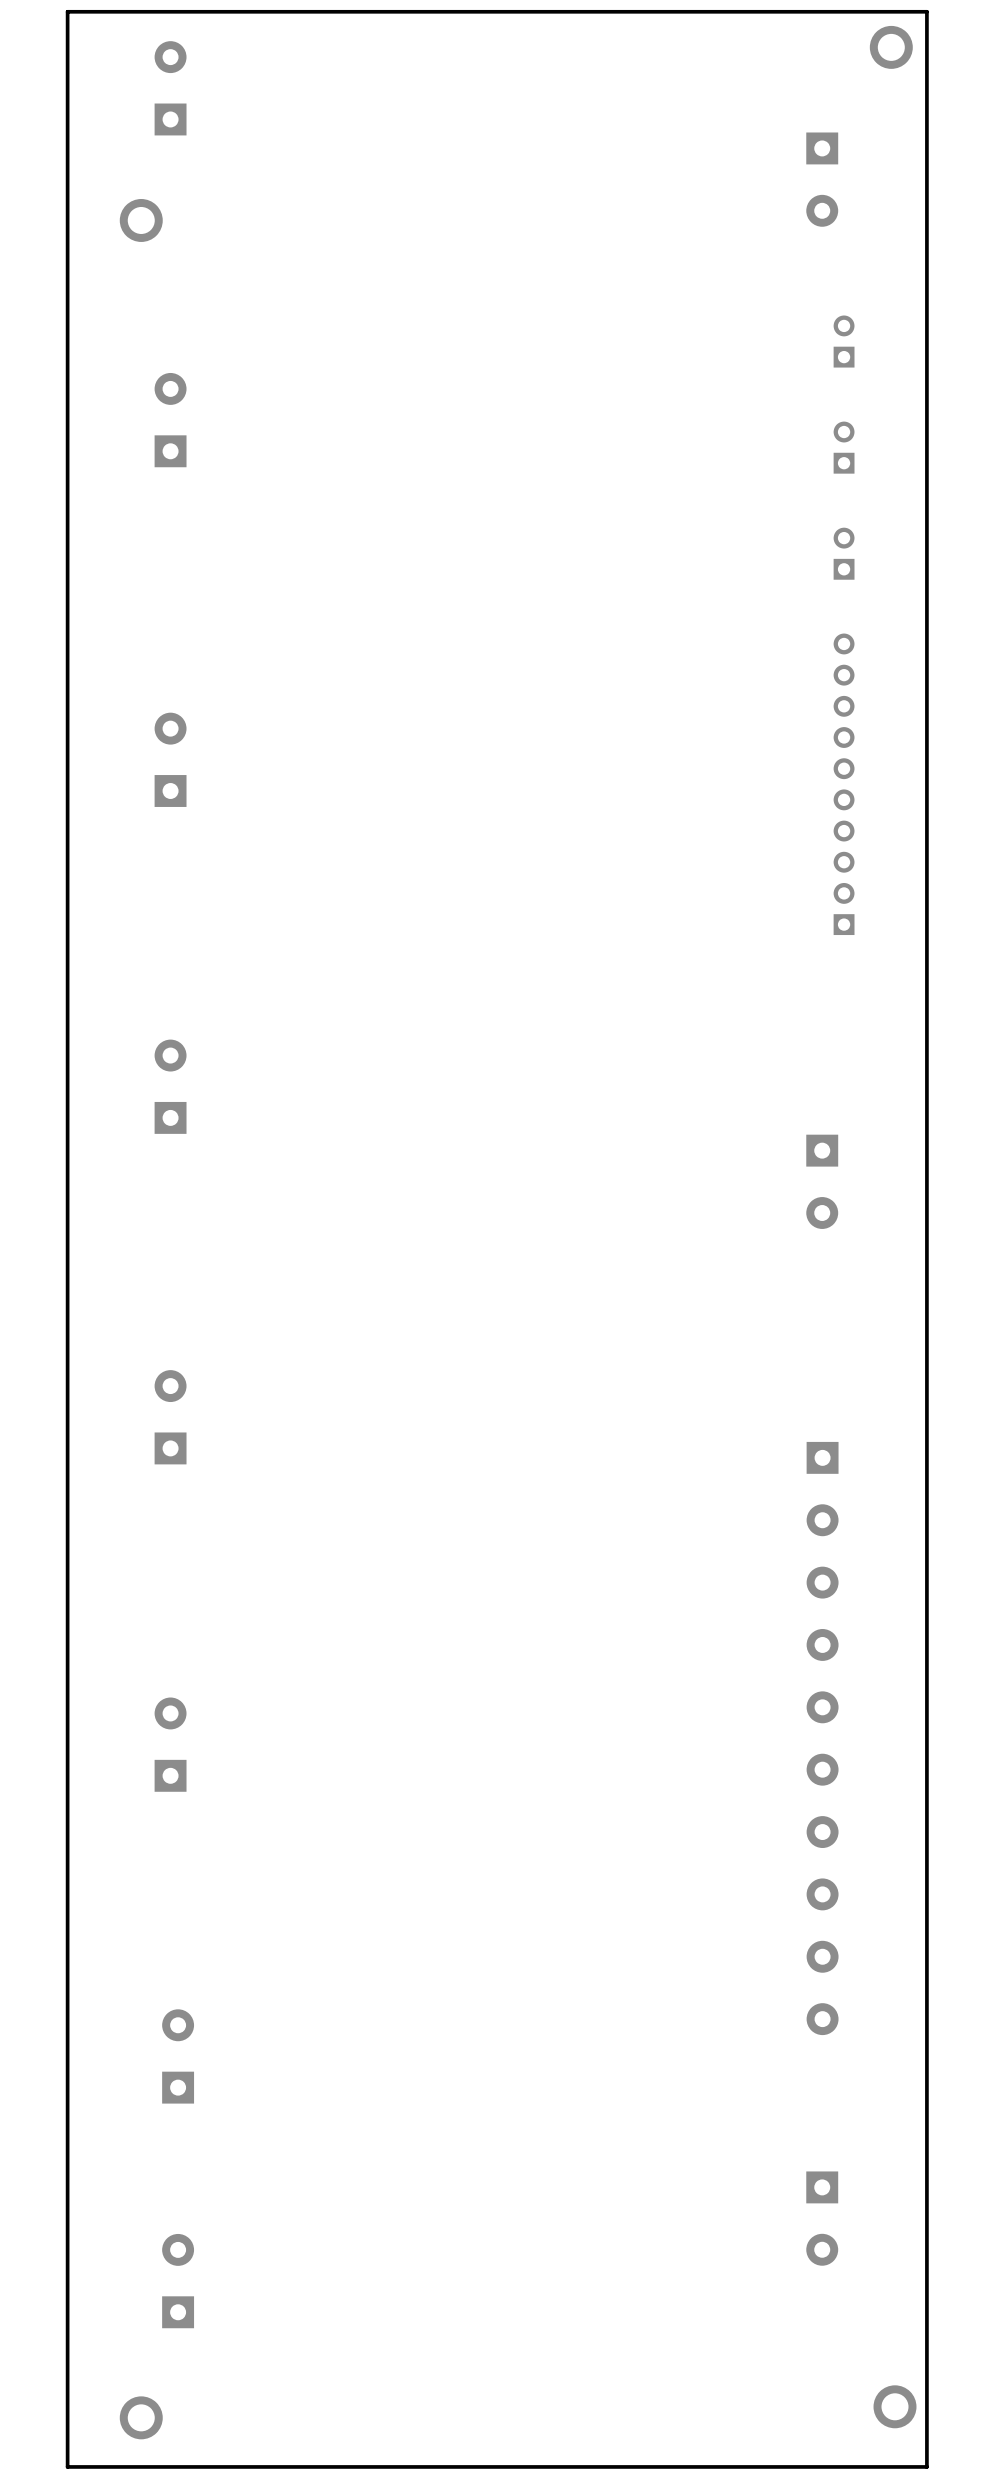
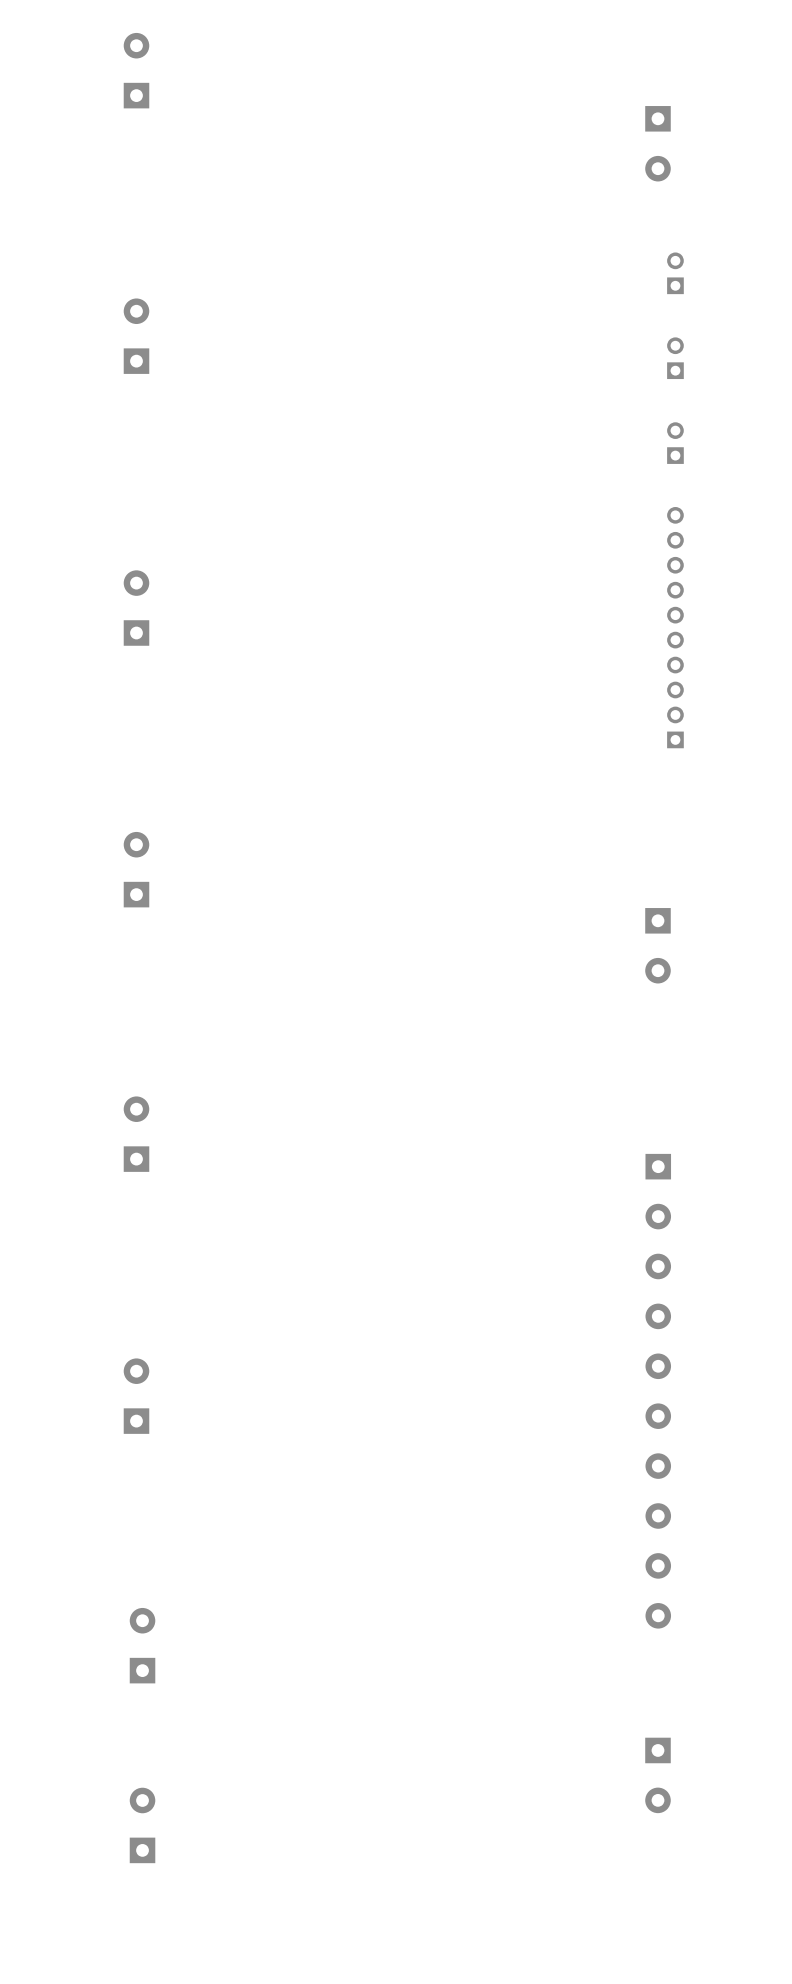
board edge: (926, 11) (67, 11) (67, 2466) (926, 2466) (926, 11) -> none
part: (891, 47) -> none
part: (141, 220) -> none
part: (895, 2406) -> none
part: (141, 2417) -> none

